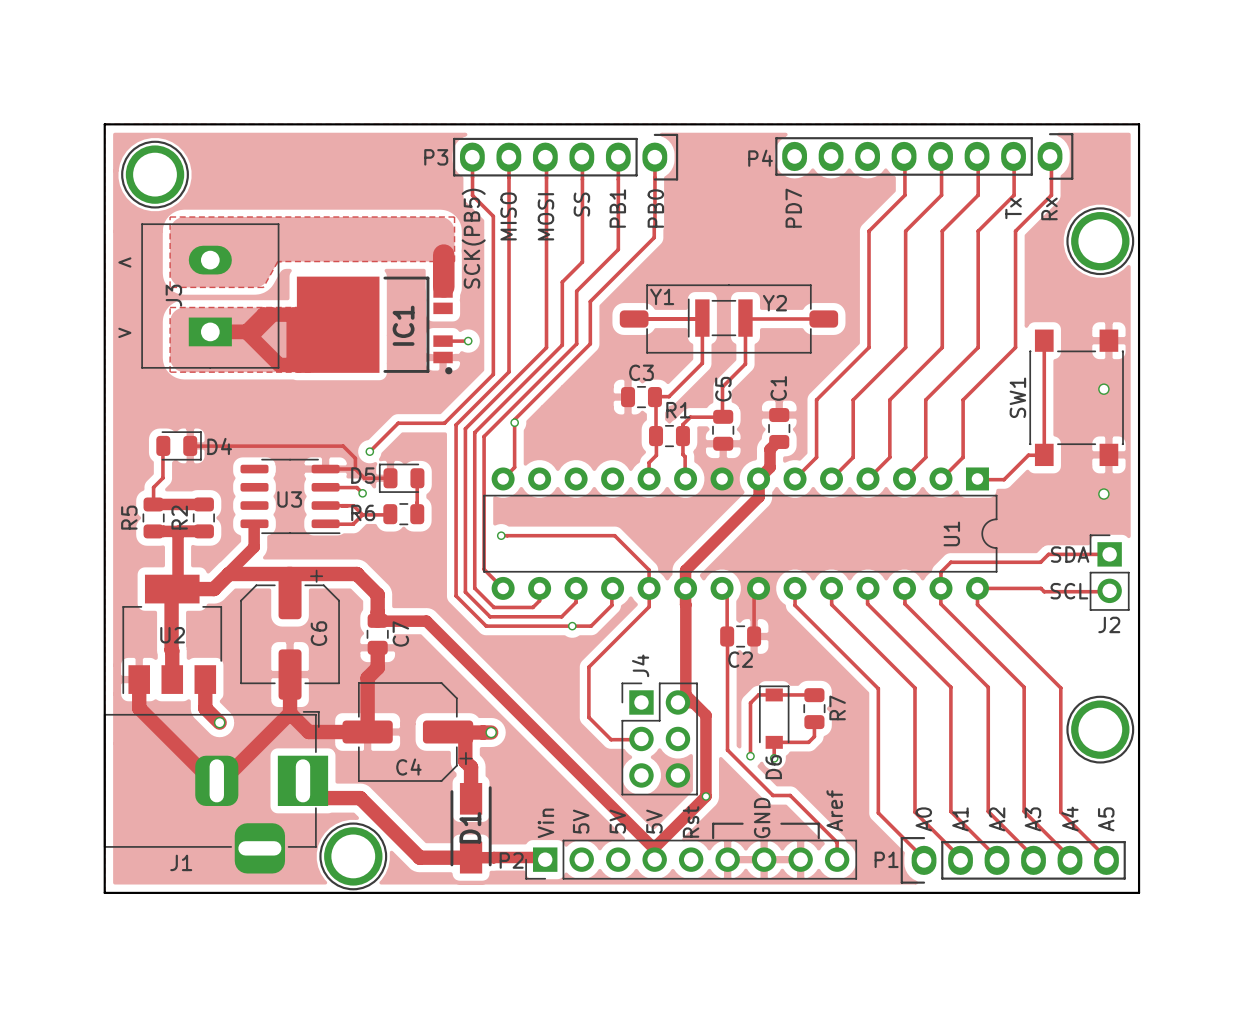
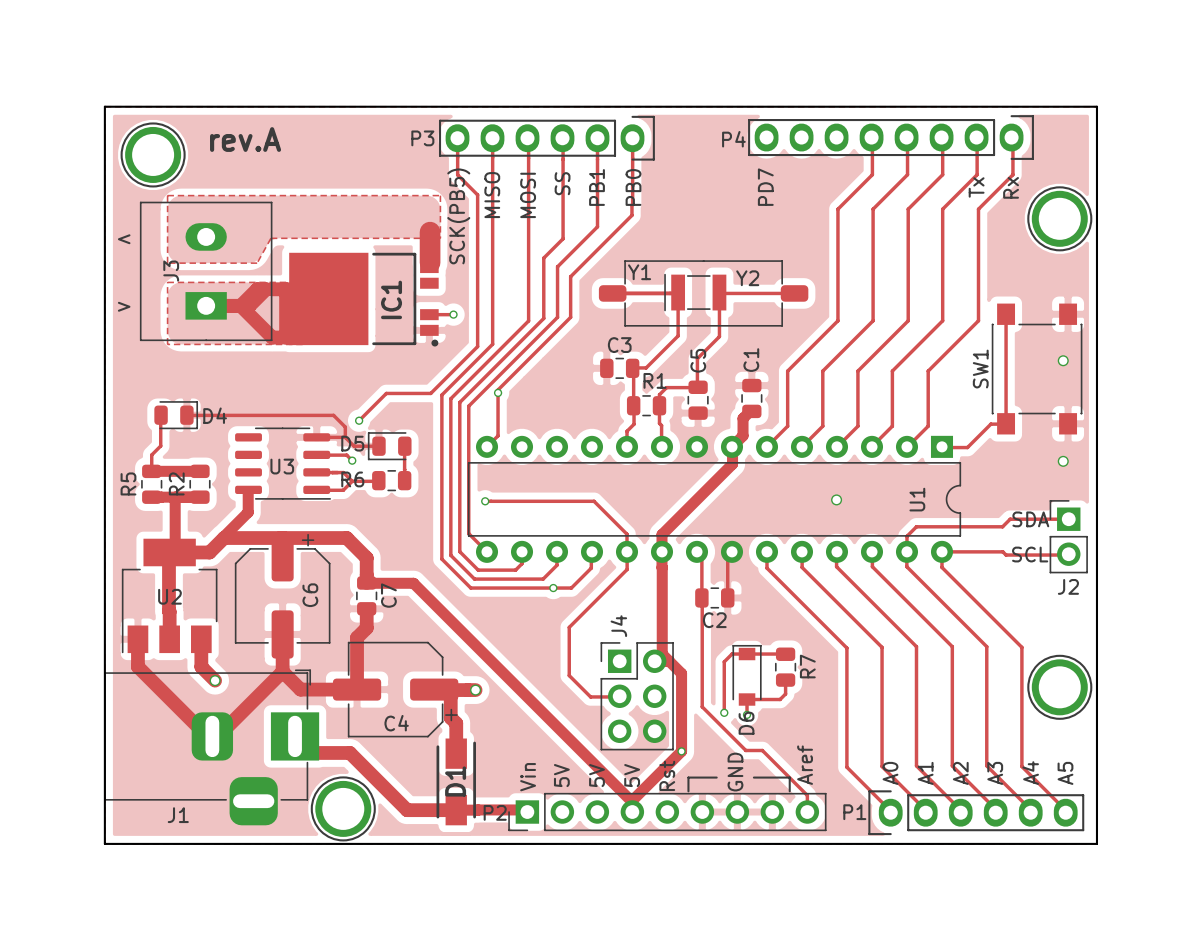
text: none -> rev.A (245, 139)
via: none -> (836, 499)

